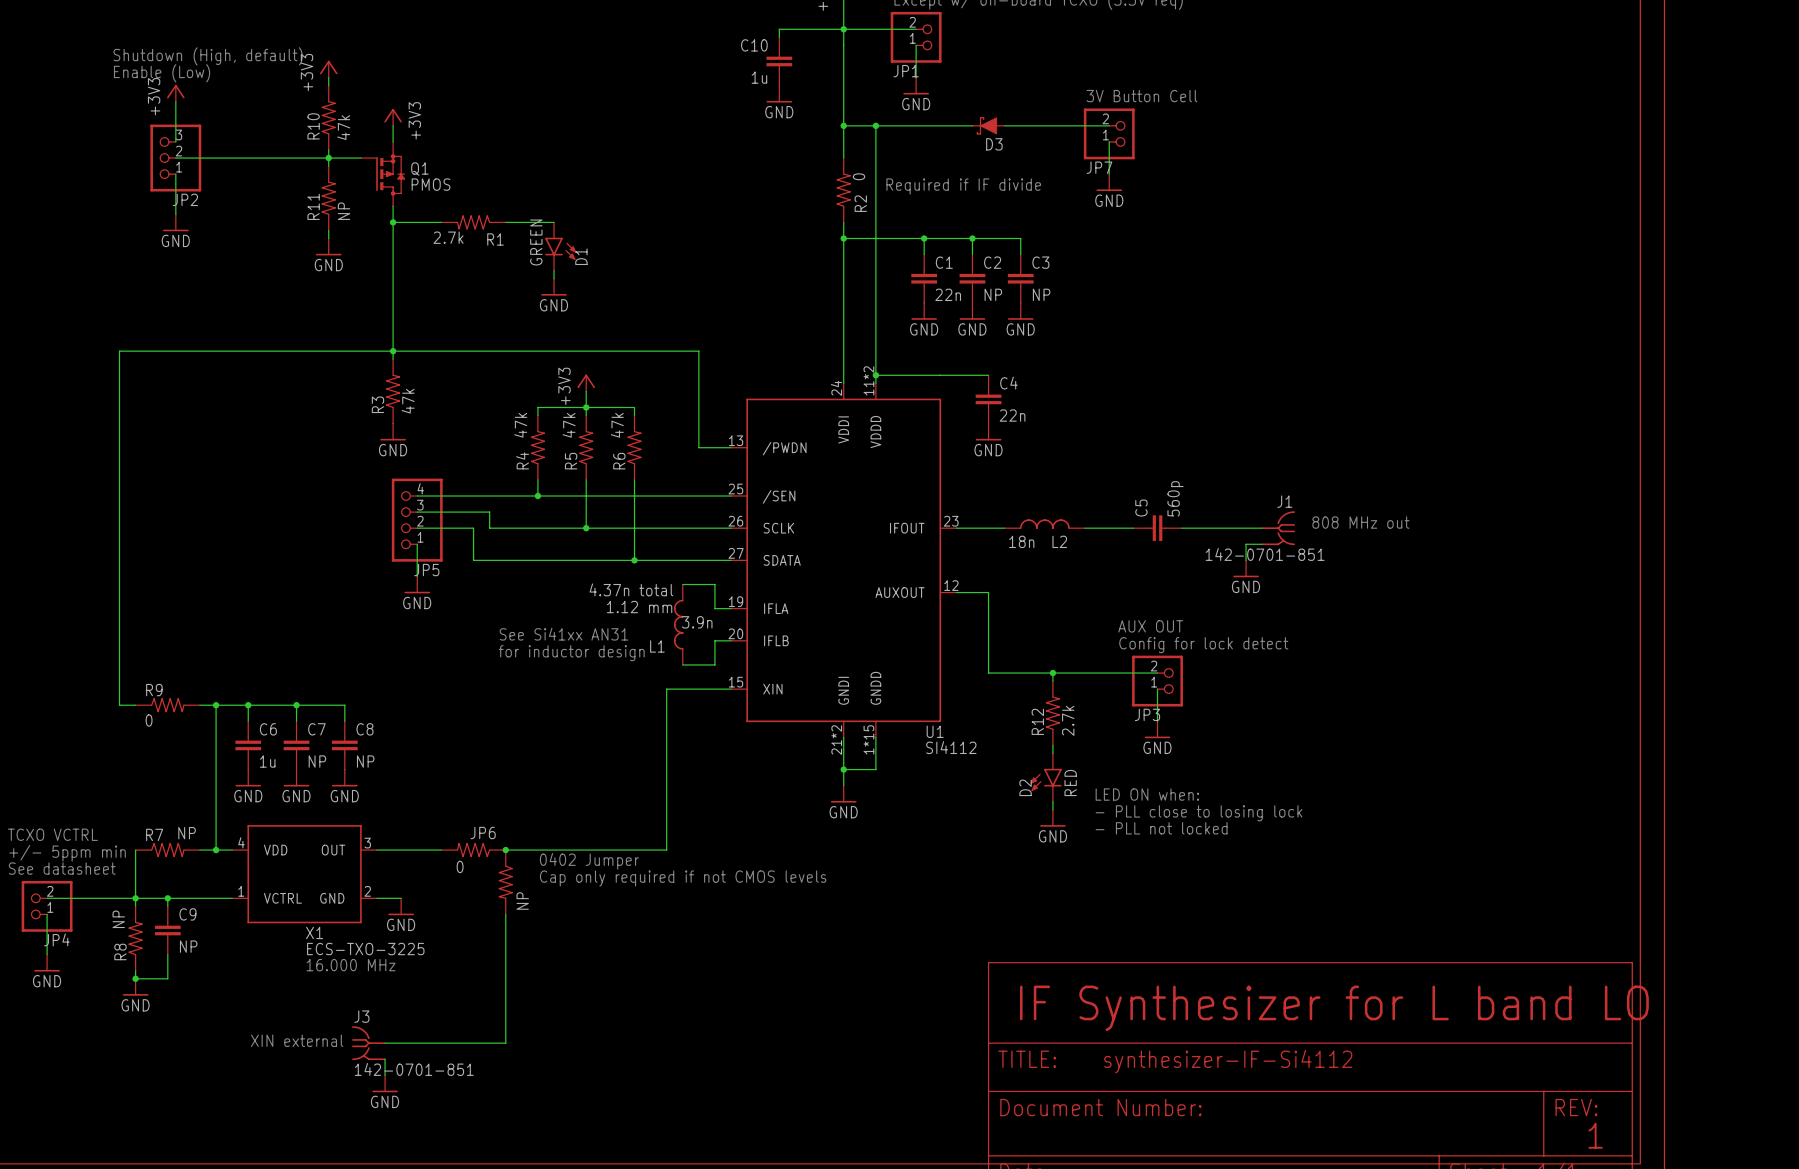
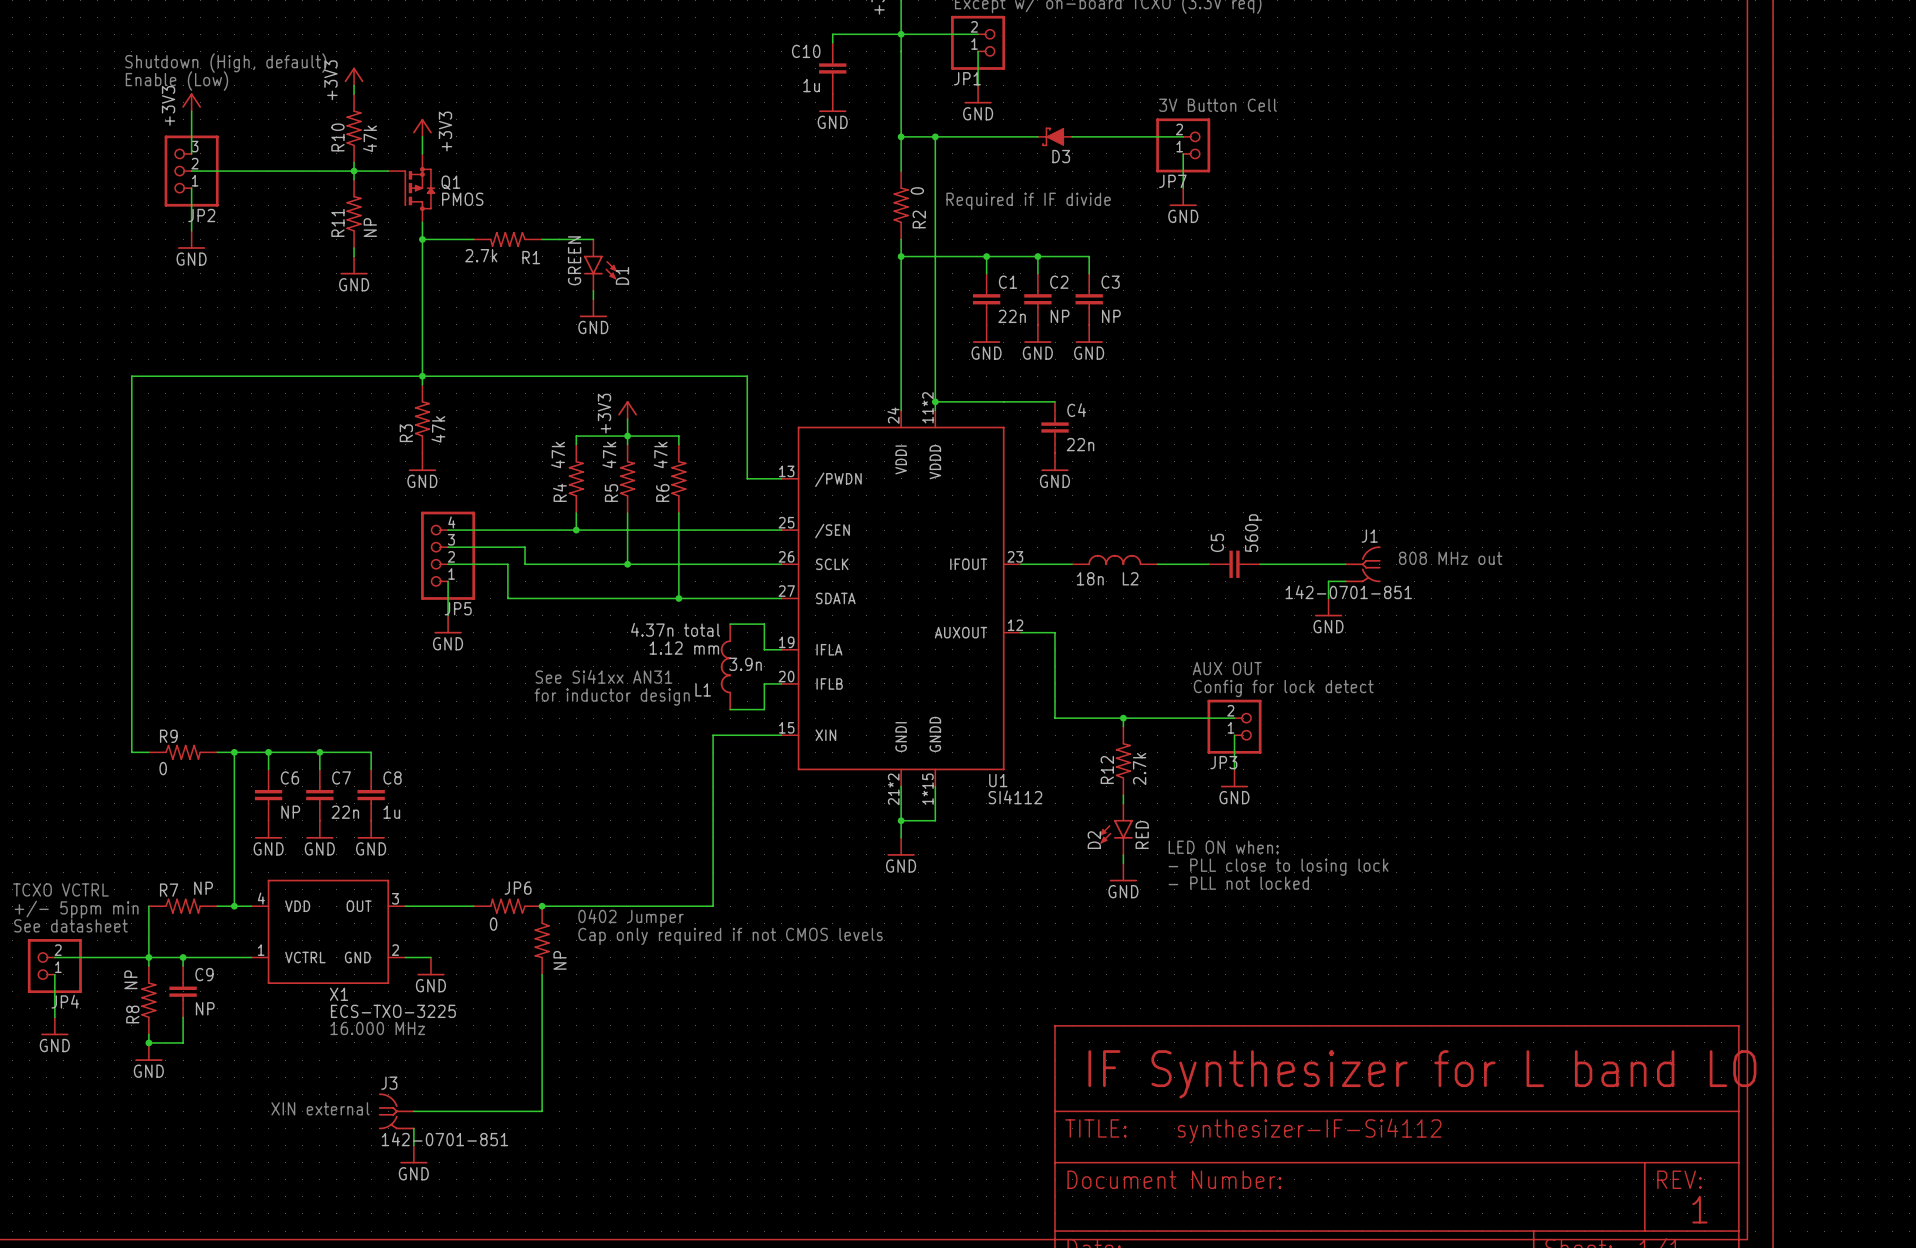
C6 value: 1u (267, 761) -> NP (290, 812)
C7 value: NP (317, 761) -> 22n (345, 812)
C8 value: NP (365, 761) -> 1u (391, 812)

